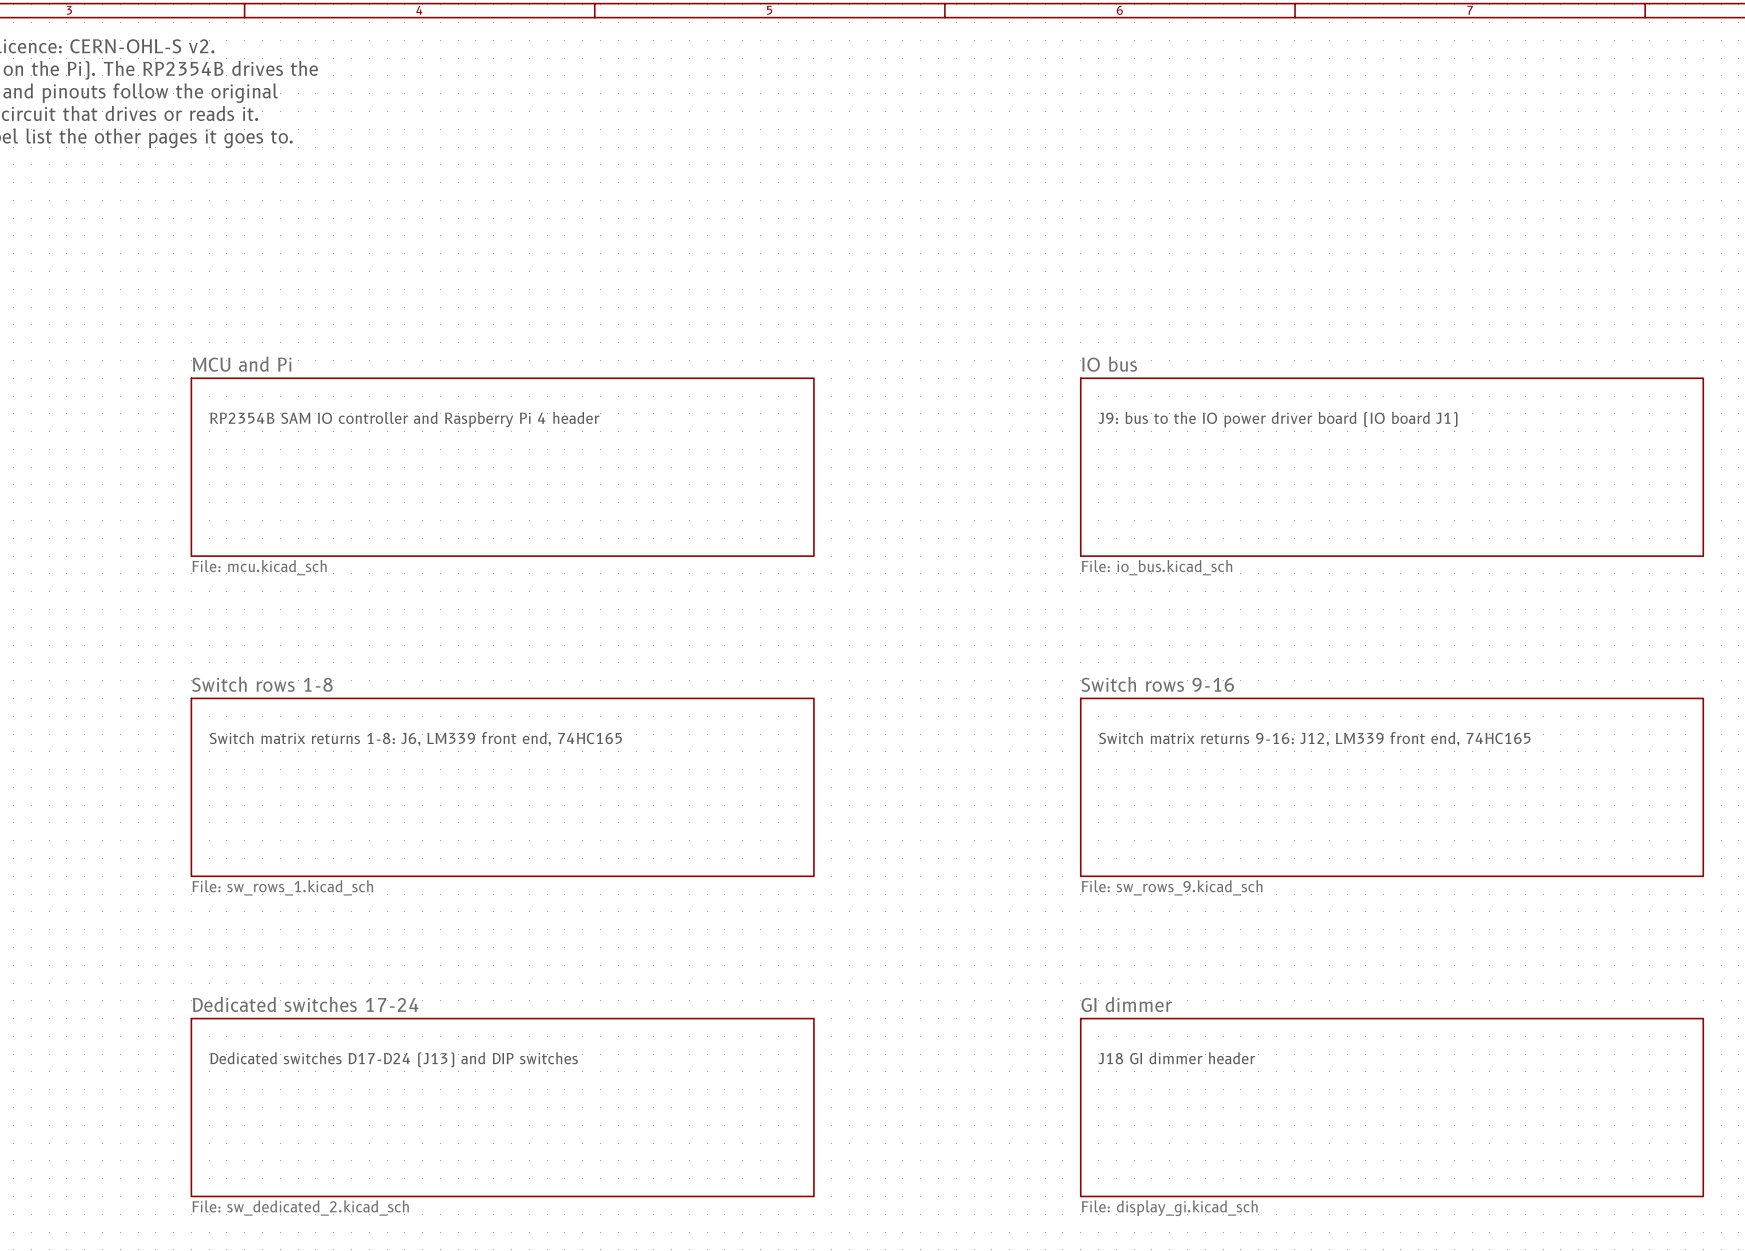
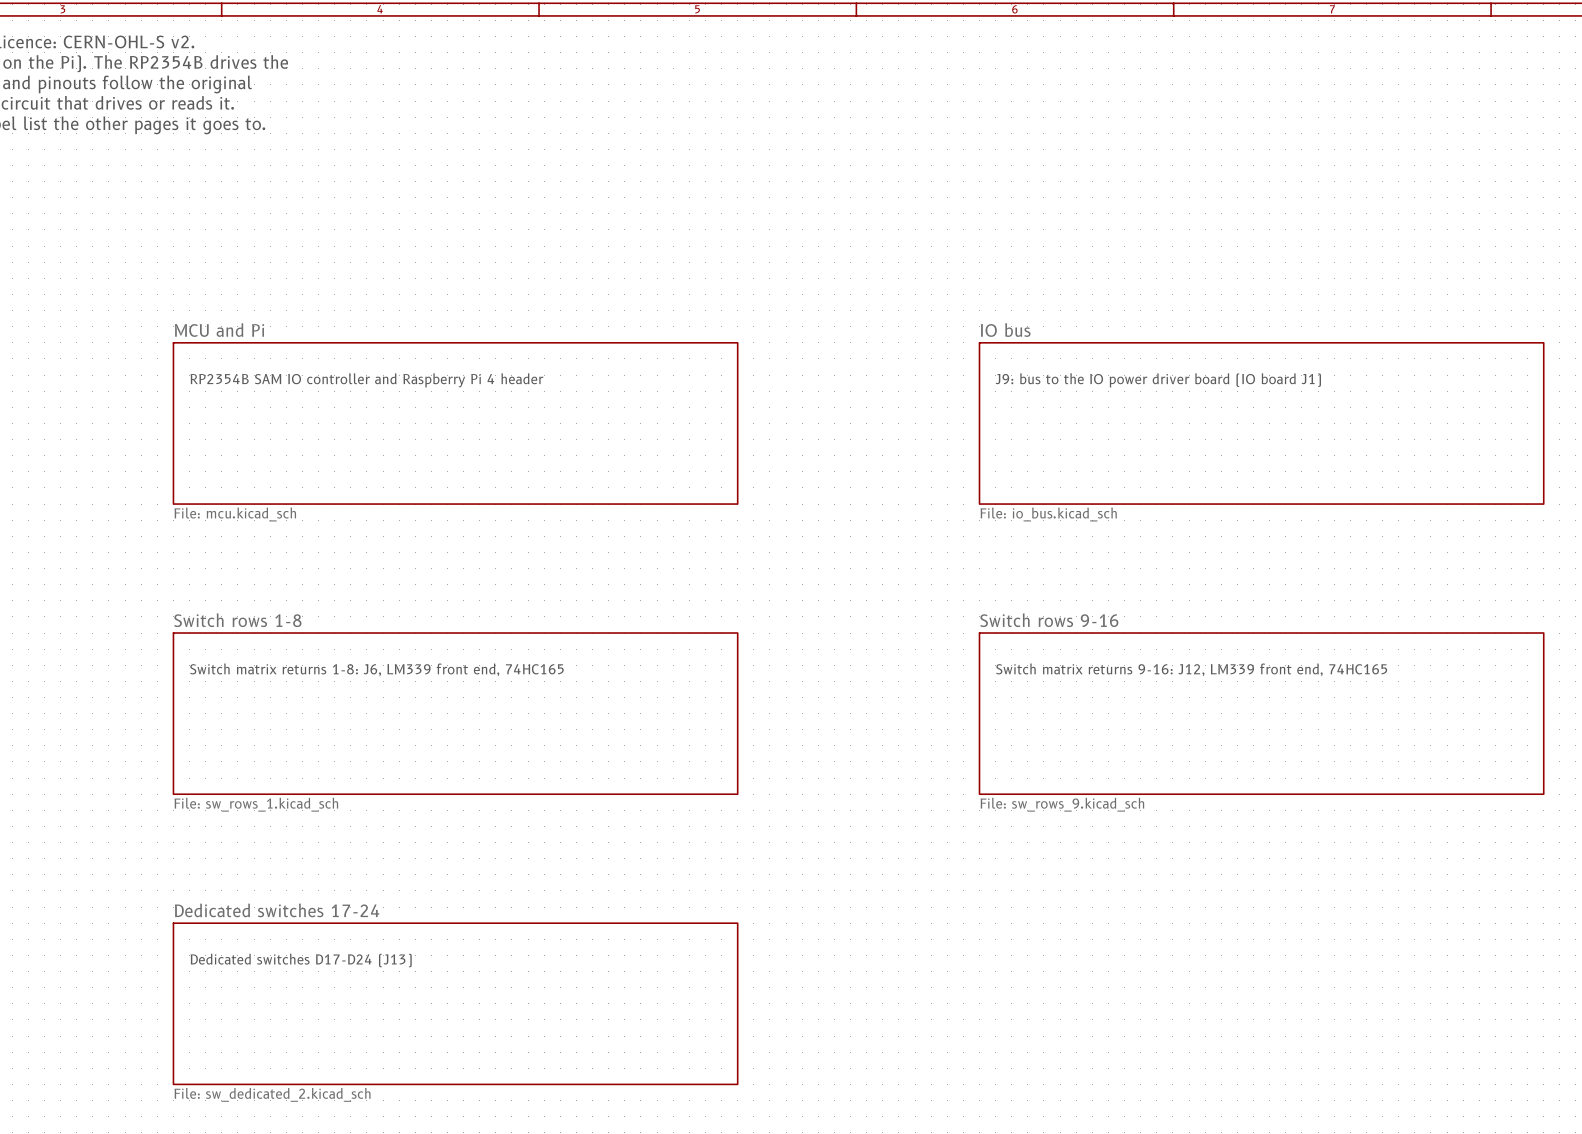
text: J18 GI dimmer header (1176, 1058) -> none
text: Dedicated switches D17-D24 (J13) and DIP switches (394, 1059) -> Dedicated switches D17-D24 (J13) (301, 960)
sheet GI dimmer: File: display_gi.kicad_sch (1392, 1107) -> none

